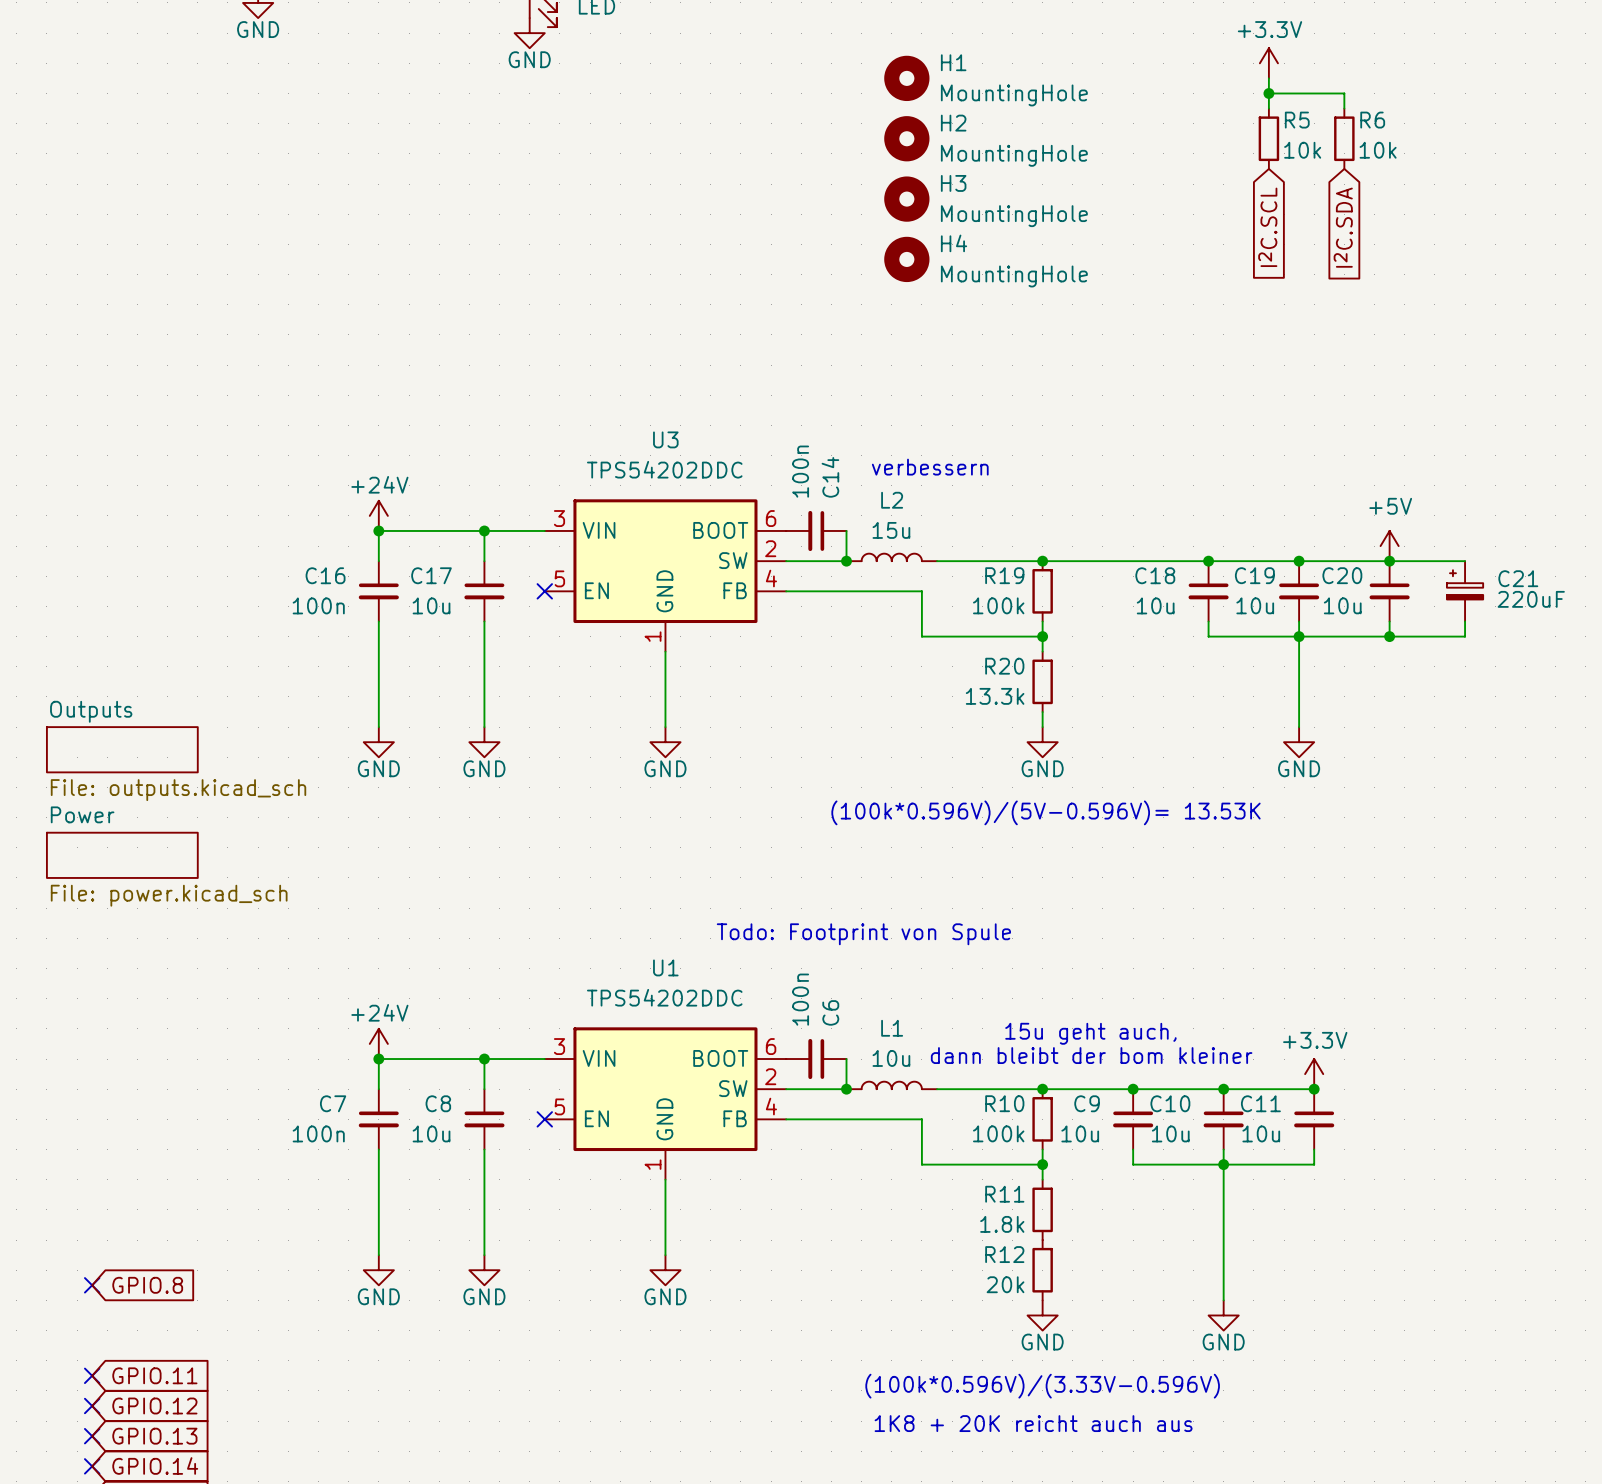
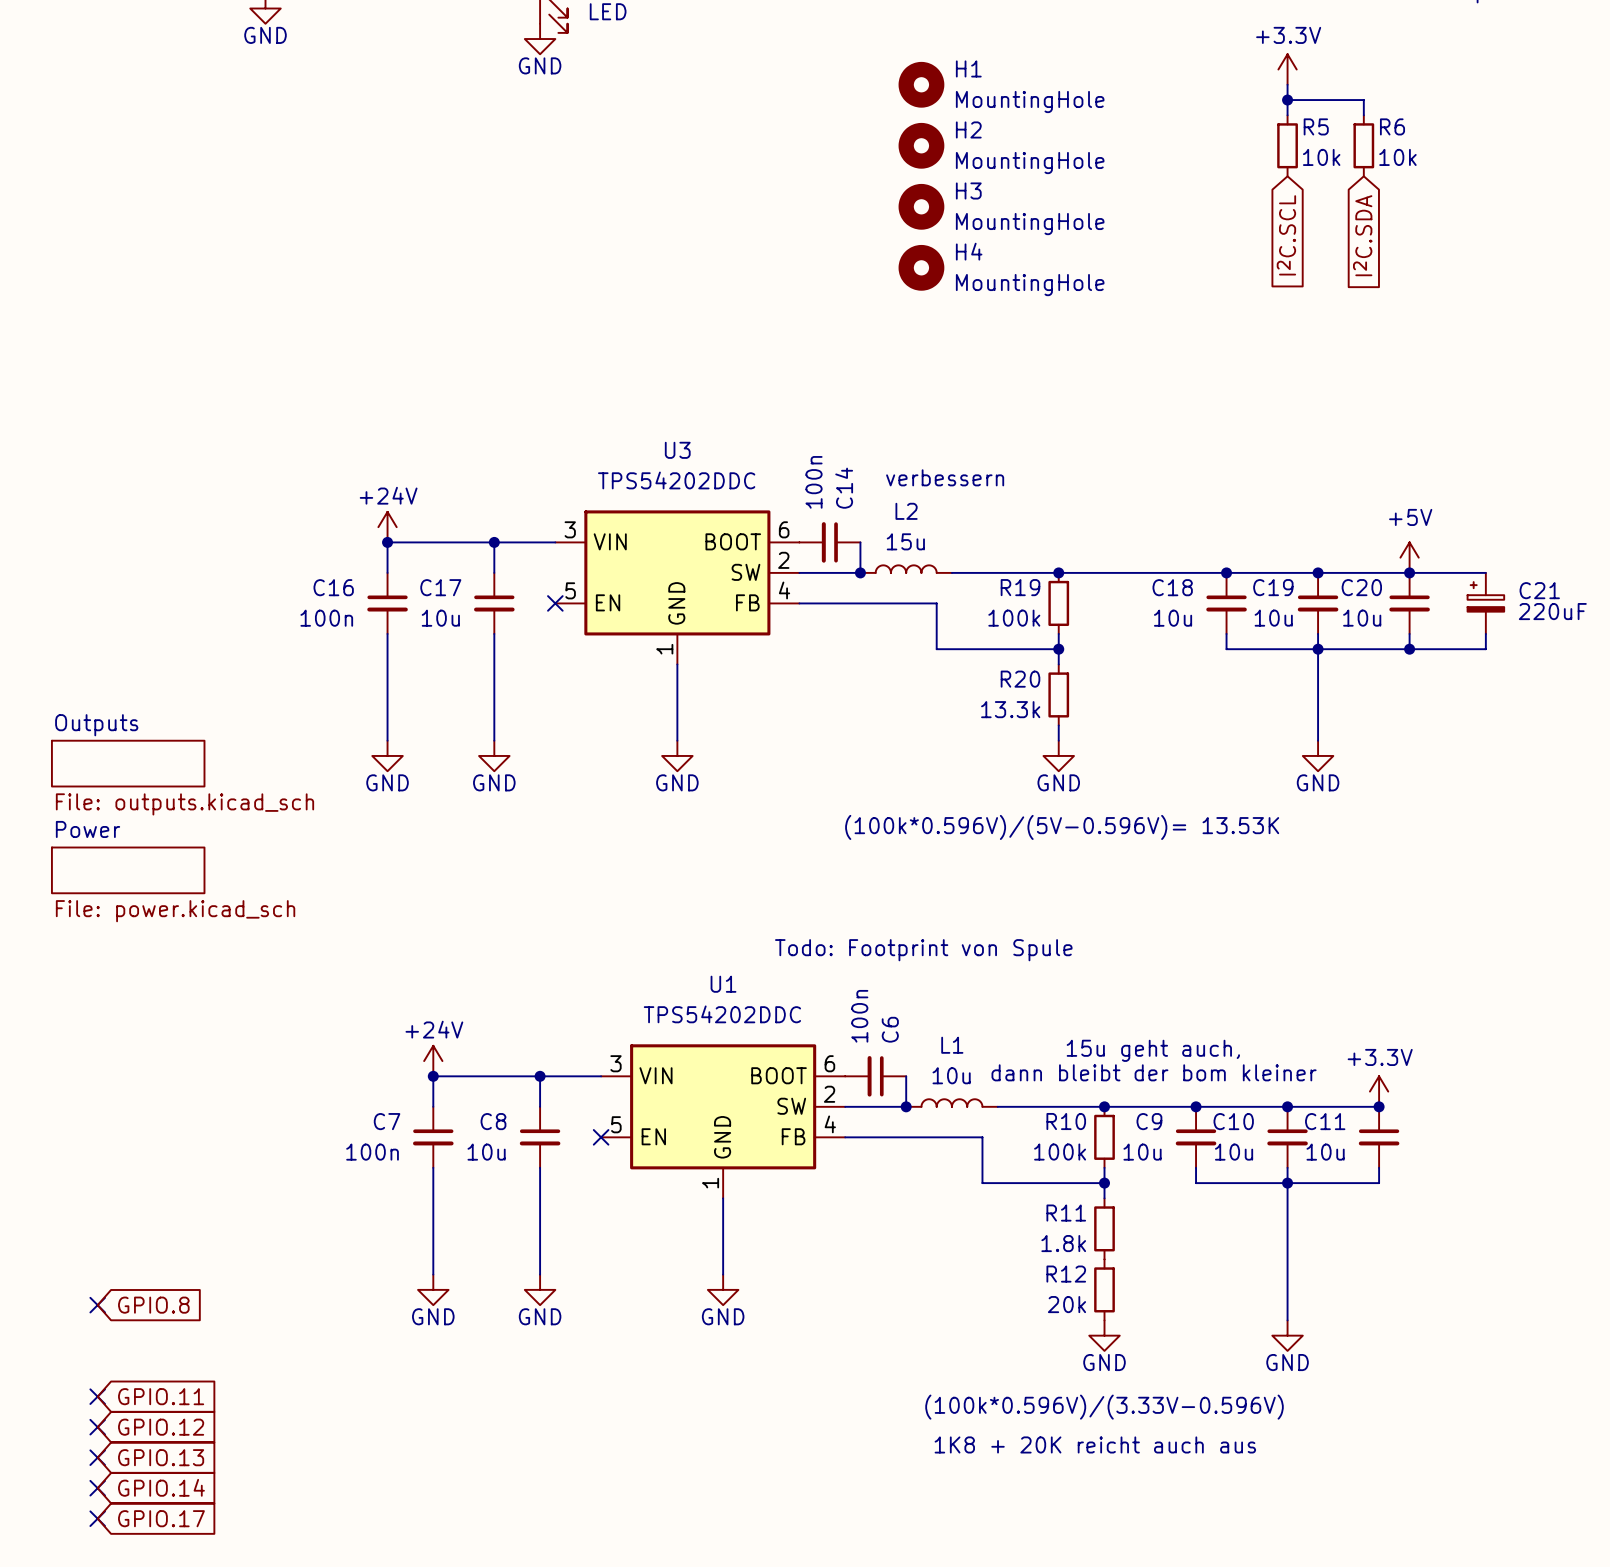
text position: Todo: Footprint von Spule (863, 934) -> Todo: Footprint von Spule (923, 950)
text position: 15u geht auch, (1090, 1033) -> 15u geht auch, (1153, 1050)
power symbol position: +24V (378, 1043) -> +24V (433, 1061)
text position: dann bleibt der bom kleiner (1091, 1055) -> dann bleibt der bom kleiner (1154, 1072)
junction: (378, 1059) -> none
wire: (424, 1059) (378, 1059) (378, 1089) -> (433, 1076) (433, 1106)
junction: none -> (433, 1076)
wire: (484, 1059) (484, 1089) -> (540, 1076) (540, 1106)
junction: (484, 1059) -> none
junction: none -> (540, 1076)
C6 position: (816, 1059) -> (875, 1076)
wire: (846, 1059) (846, 1089) -> (906, 1076) (906, 1106) (860, 1106)
power symbol position: +3.3V (1314, 1074) -> +3.3V (1379, 1091)
L1 position: (891, 1085) -> (951, 1103)
junction position: (846, 1089) -> (906, 1106)
wire: (937, 1089) (982, 1089) -> (1058, 1183) (1104, 1183)
junction: (1042, 1089) -> none
junction: none -> (1104, 1106)
junction: (1133, 1089) -> none
junction: none -> (1196, 1106)
junction: (1223, 1089) -> none
junction: none -> (1287, 1106)
wire: none -> (1333, 1106) (1379, 1106)
junction: (1314, 1089) -> none
junction: none -> (1379, 1106)
U1 position: (665, 1103) -> (723, 1121)
C7 position: (378, 1119) -> (433, 1137)
C8 position: (484, 1119) -> (540, 1137)
no-connect mark position: (544, 1119) -> (601, 1137)
wire: (921, 1119) (921, 1164) (967, 1164) -> (936, 1137) (982, 1137) (982, 1183)
R10 position: (1042, 1119) -> (1104, 1137)
C9 position: (1133, 1119) -> (1196, 1137)
C10 position: (1223, 1119) -> (1287, 1137)
C11 position: (1314, 1119) -> (1379, 1137)
wire: (378, 1149) (378, 1255) -> (433, 1167) (433, 1274)
wire: (484, 1149) (484, 1255) -> (540, 1167) (540, 1274)
wire: (1042, 1149) (1042, 1179) -> (1104, 1167) (1104, 1198)
wire: (1133, 1149) (1133, 1164) (1178, 1164) -> (1196, 1167) (1196, 1183)
wire: (1223, 1149) (1223, 1300) -> (1287, 1167) (1287, 1320)
wire: (1314, 1149) (1314, 1164) -> (1379, 1167) (1379, 1183) (1333, 1183)
junction: (1042, 1164) -> none
junction: none -> (1104, 1183)
junction: (1223, 1164) -> none
junction: none -> (1287, 1183)
wire: (665, 1179) (665, 1255) -> (723, 1198) (723, 1274)
R11 position: (1042, 1209) -> (1104, 1228)
power symbol: GND (378, 1270) -> none
power symbol: none -> GND (433, 1289)
power symbol: GND (484, 1270) -> none
power symbol: none -> GND (540, 1289)
power symbol position: GND (665, 1270) -> GND (723, 1289)
R12 position: (1042, 1270) -> (1104, 1289)
power symbol position: GND (1042, 1315) -> GND (1104, 1335)
power symbol position: GND (1223, 1315) -> GND (1287, 1335)
text position: (100k*0.596V)/(3.33V-0.596V) (1042, 1386) -> (100k*0.596V)/(3.33V-0.596V) (1104, 1407)
text position: 1K8 + 20K reicht auch aus (1033, 1423) -> 1K8 + 20K reicht auch aus (1095, 1444)

